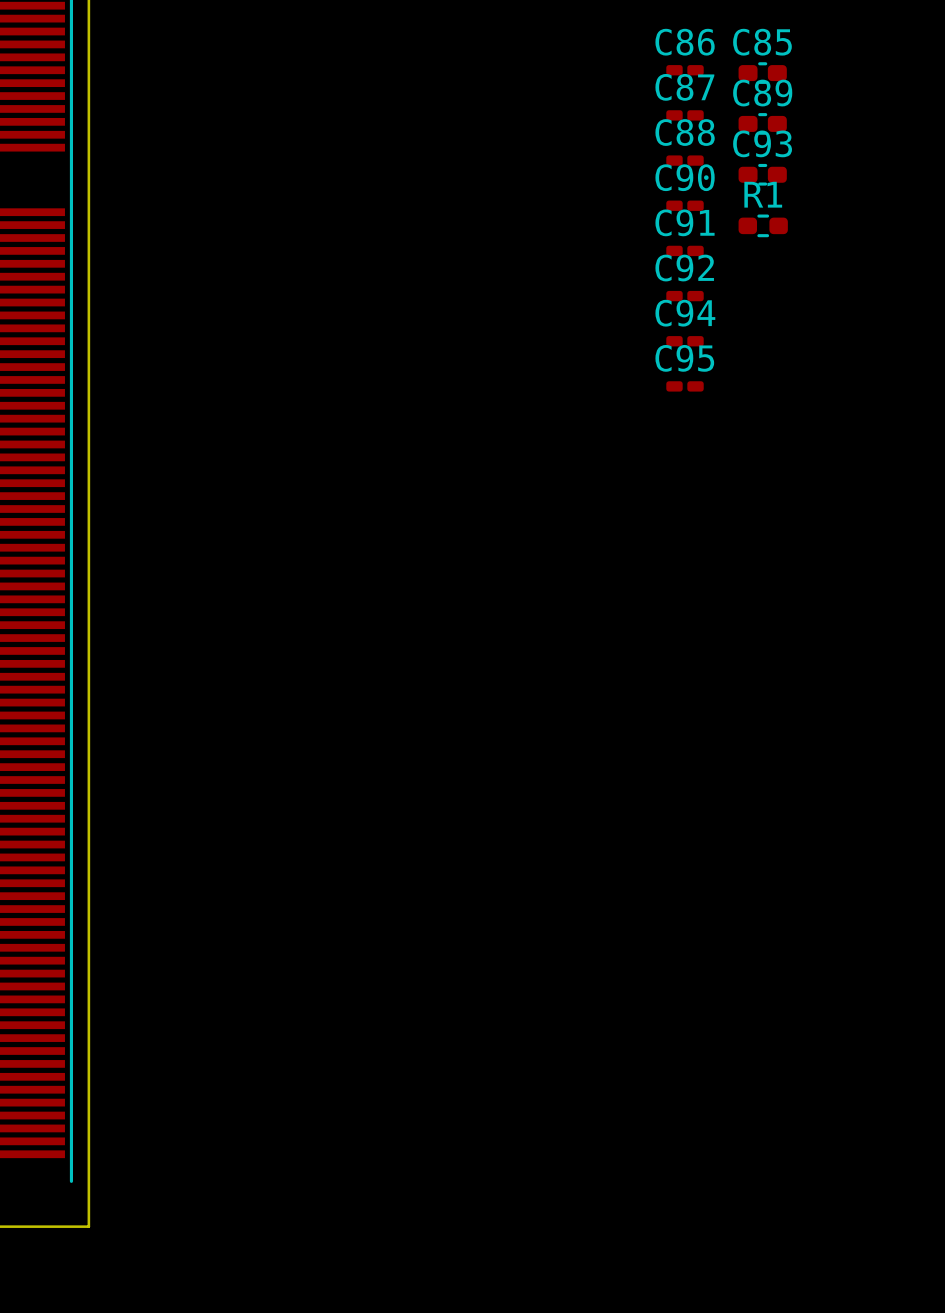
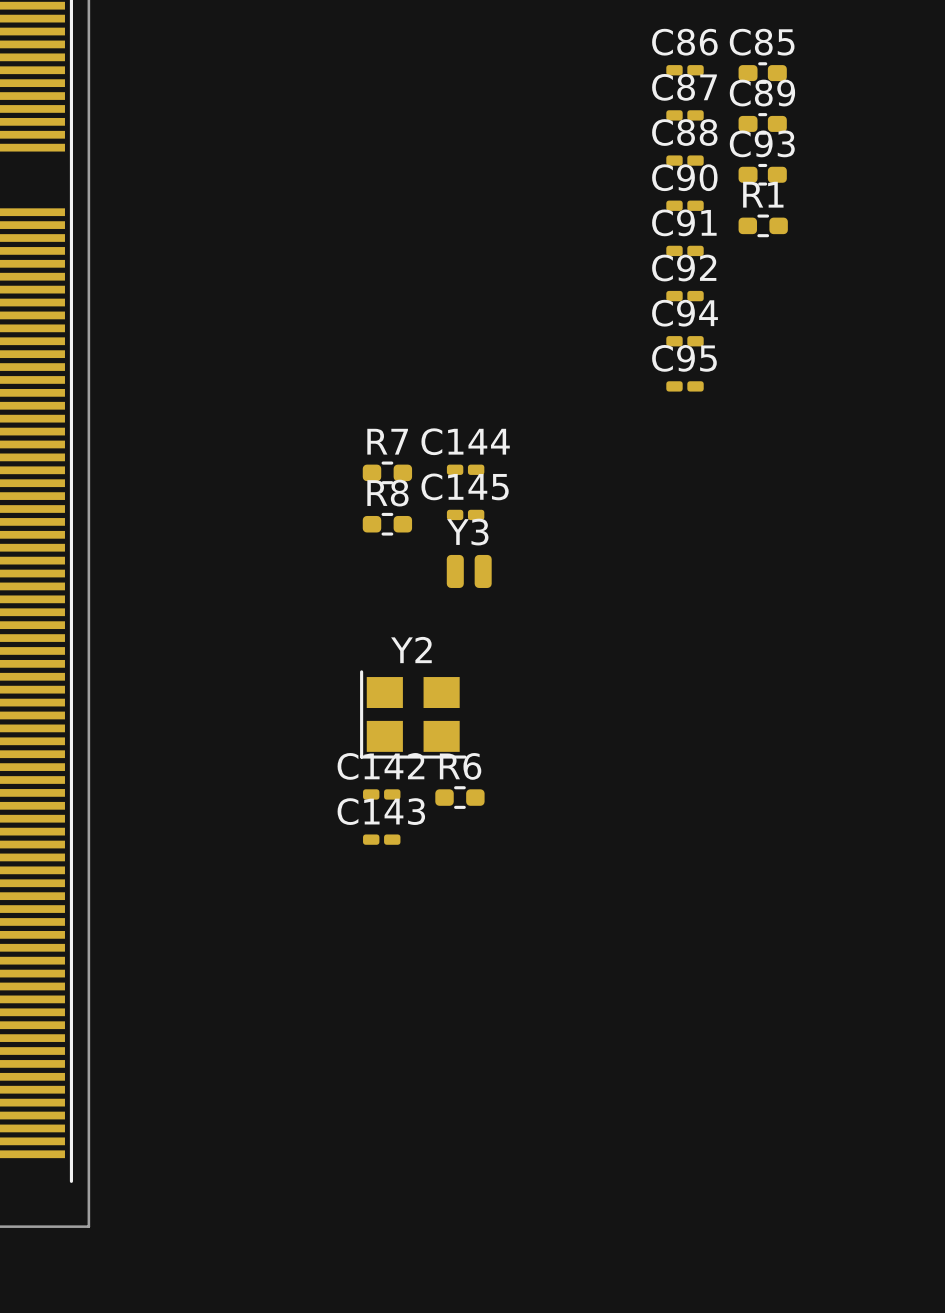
C144: none -> (465, 469)
R7: none -> (387, 472)
C145: none -> (465, 514)
R8: none -> (387, 524)
Y3: none -> (469, 571)
Y2: none -> (413, 714)
C142: none -> (381, 794)
R6: none -> (459, 797)
C143: none -> (381, 839)

